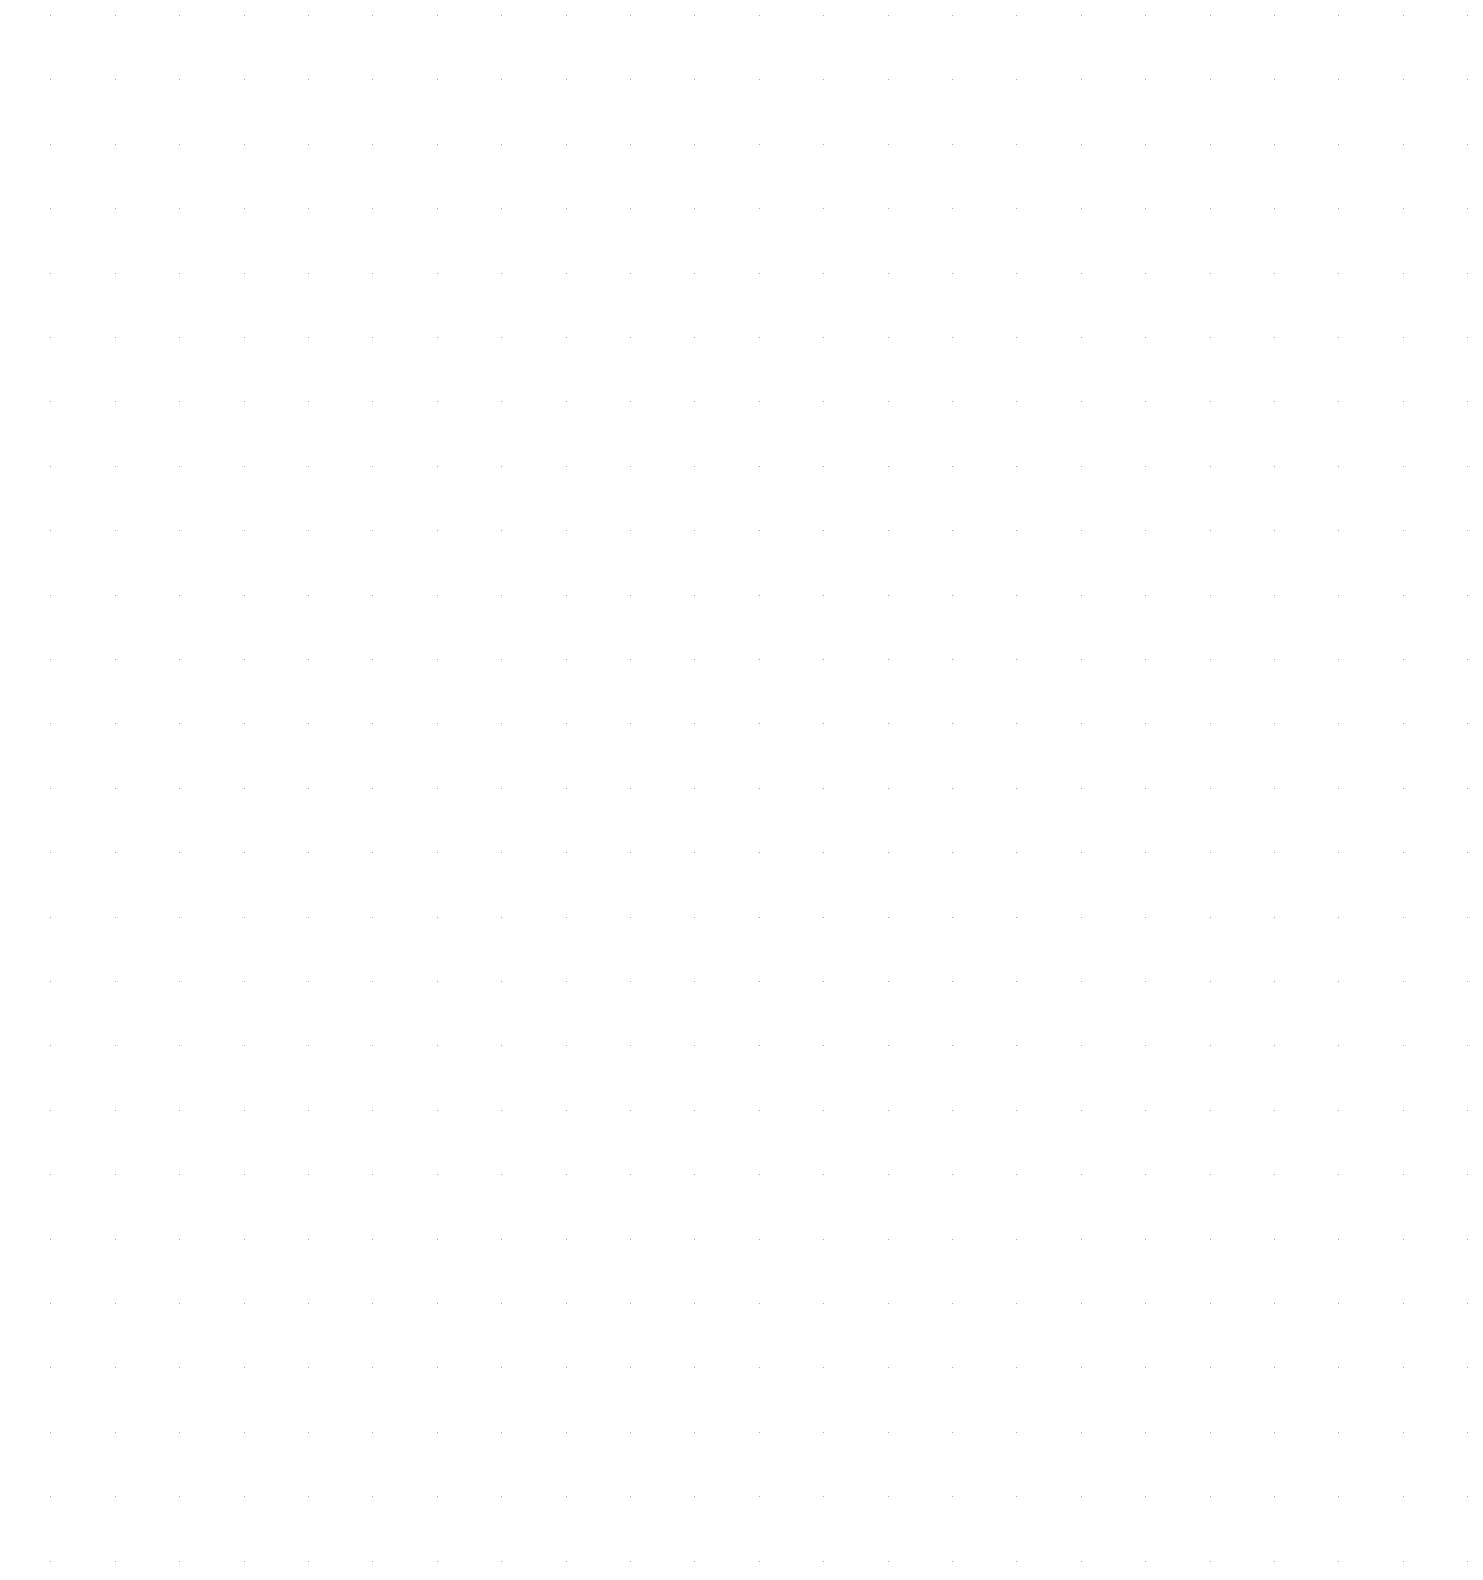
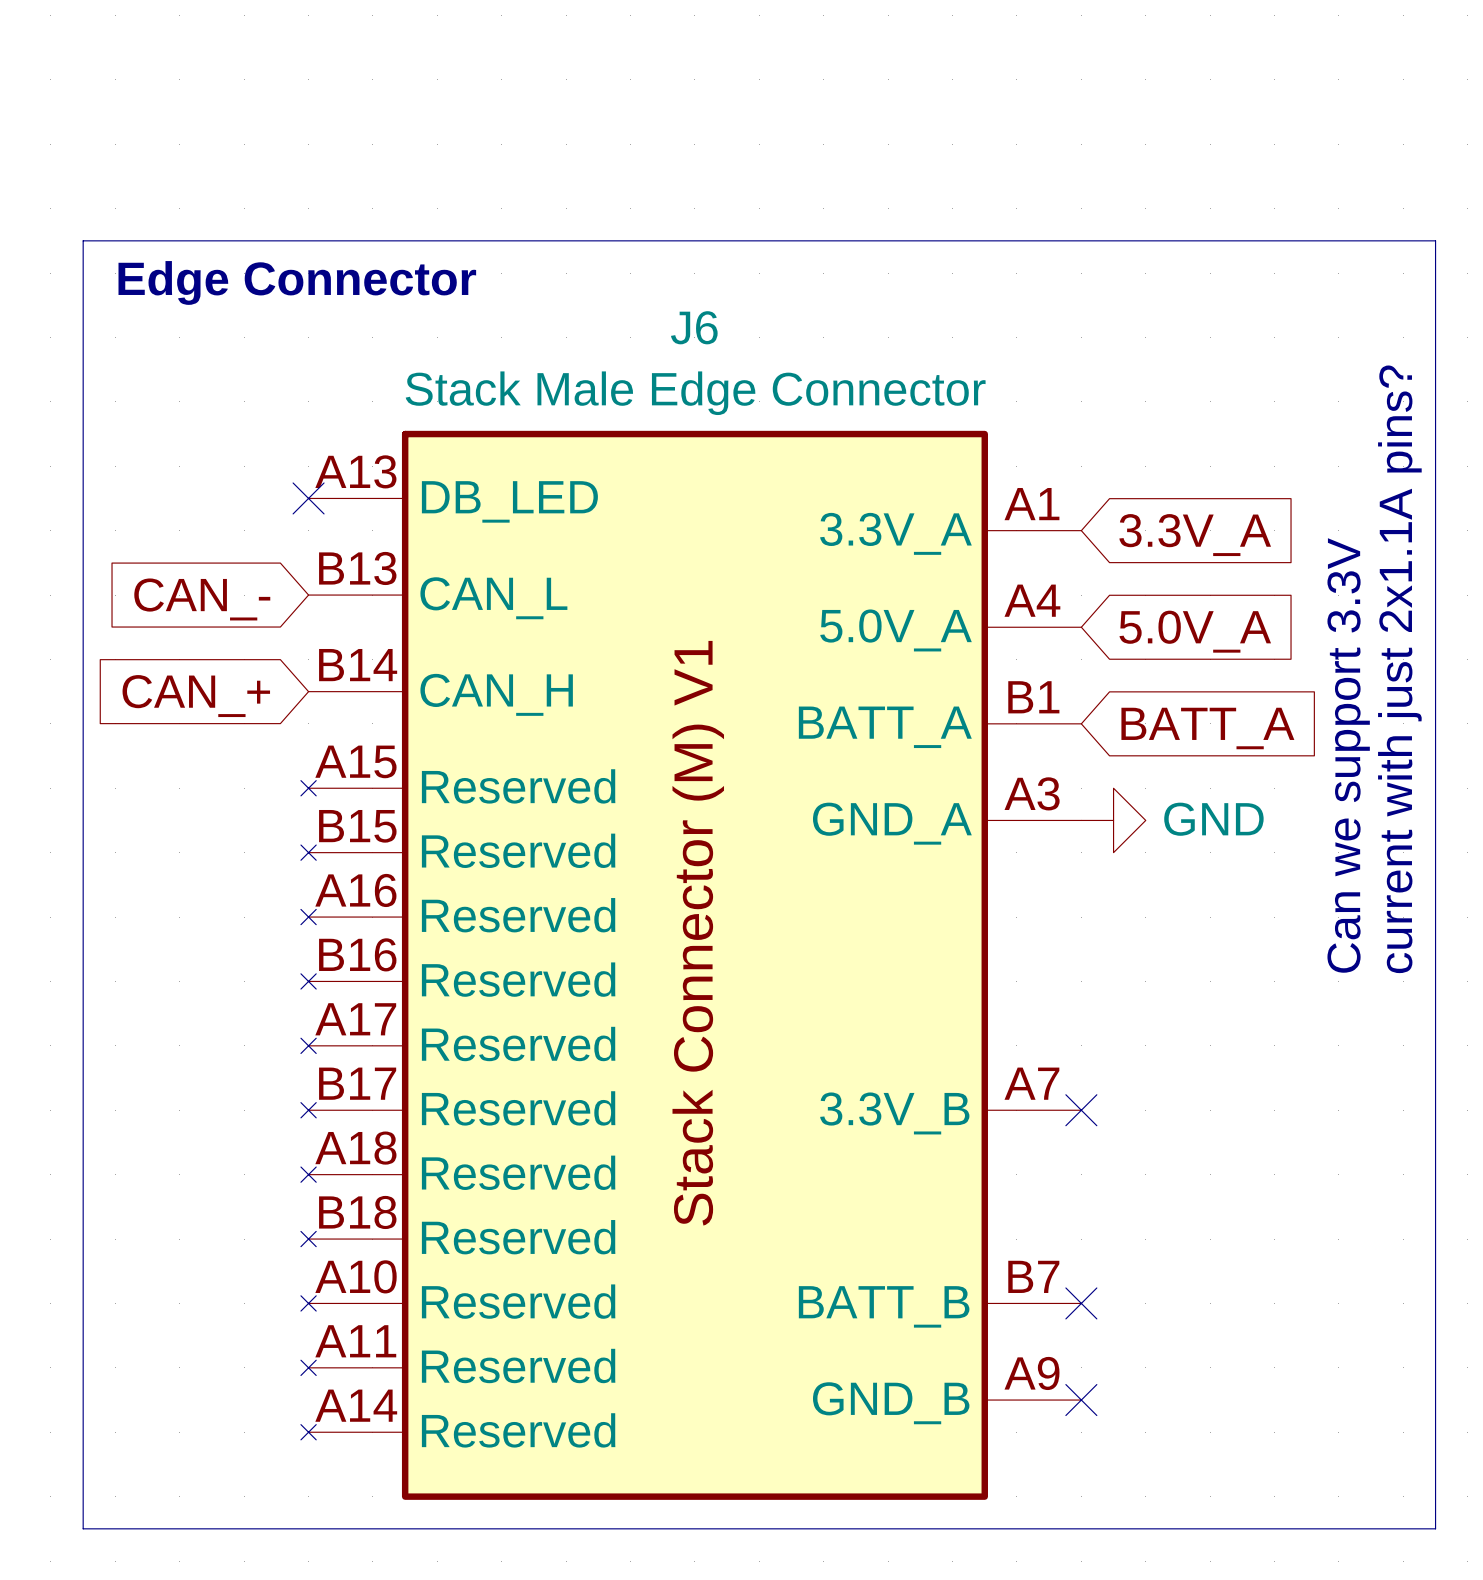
line: none -> (83, 240) (1435, 240) (1435, 1528) (83, 1528) (83, 240)
text: none -> Edge Connector (297, 282)
no-connect mark: none -> (308, 498)
global label: none -> 3.3V_A (1195, 535)
global label: none -> CAN_- (202, 599)
global label: none -> 5.0V_A (1195, 631)
text: none -> current with just 2x1.1A pins? (1399, 669)
global label: none -> CAN_+ (196, 696)
global label: none -> BATT_A (1207, 728)
text: none -> Can we support 3.3V (1348, 755)
power symbol: none -> GND (1113, 820)
J6: none -> Stack Male Edge Connector (691, 965)
no-connect mark: none -> (1081, 1110)
no-connect mark: none -> (1081, 1303)
no-connect mark: none -> (1081, 1400)

